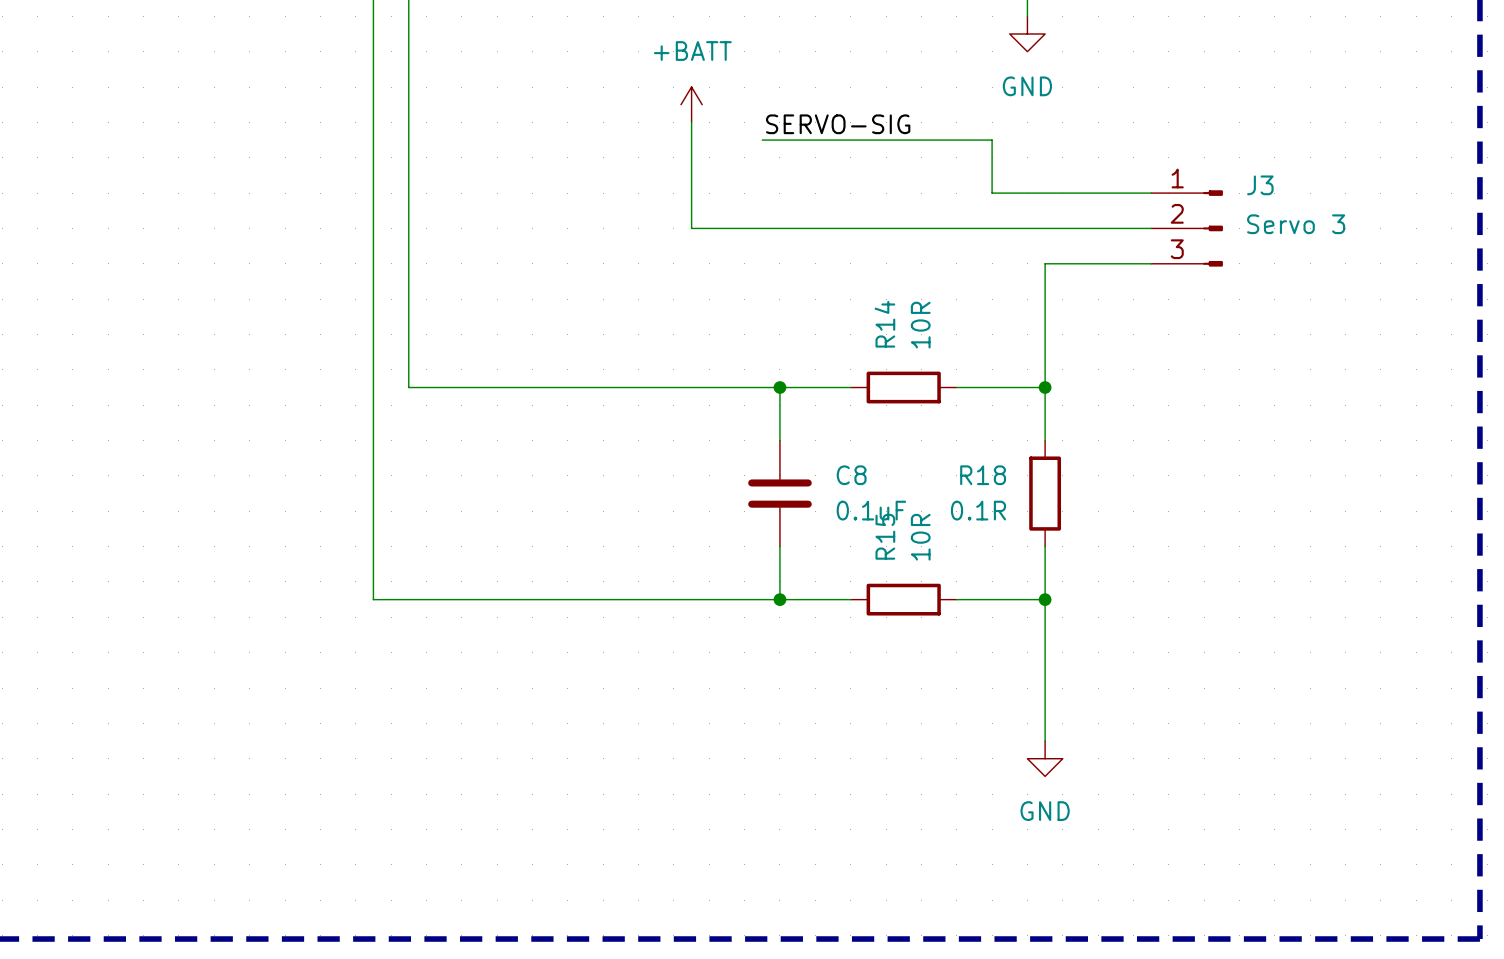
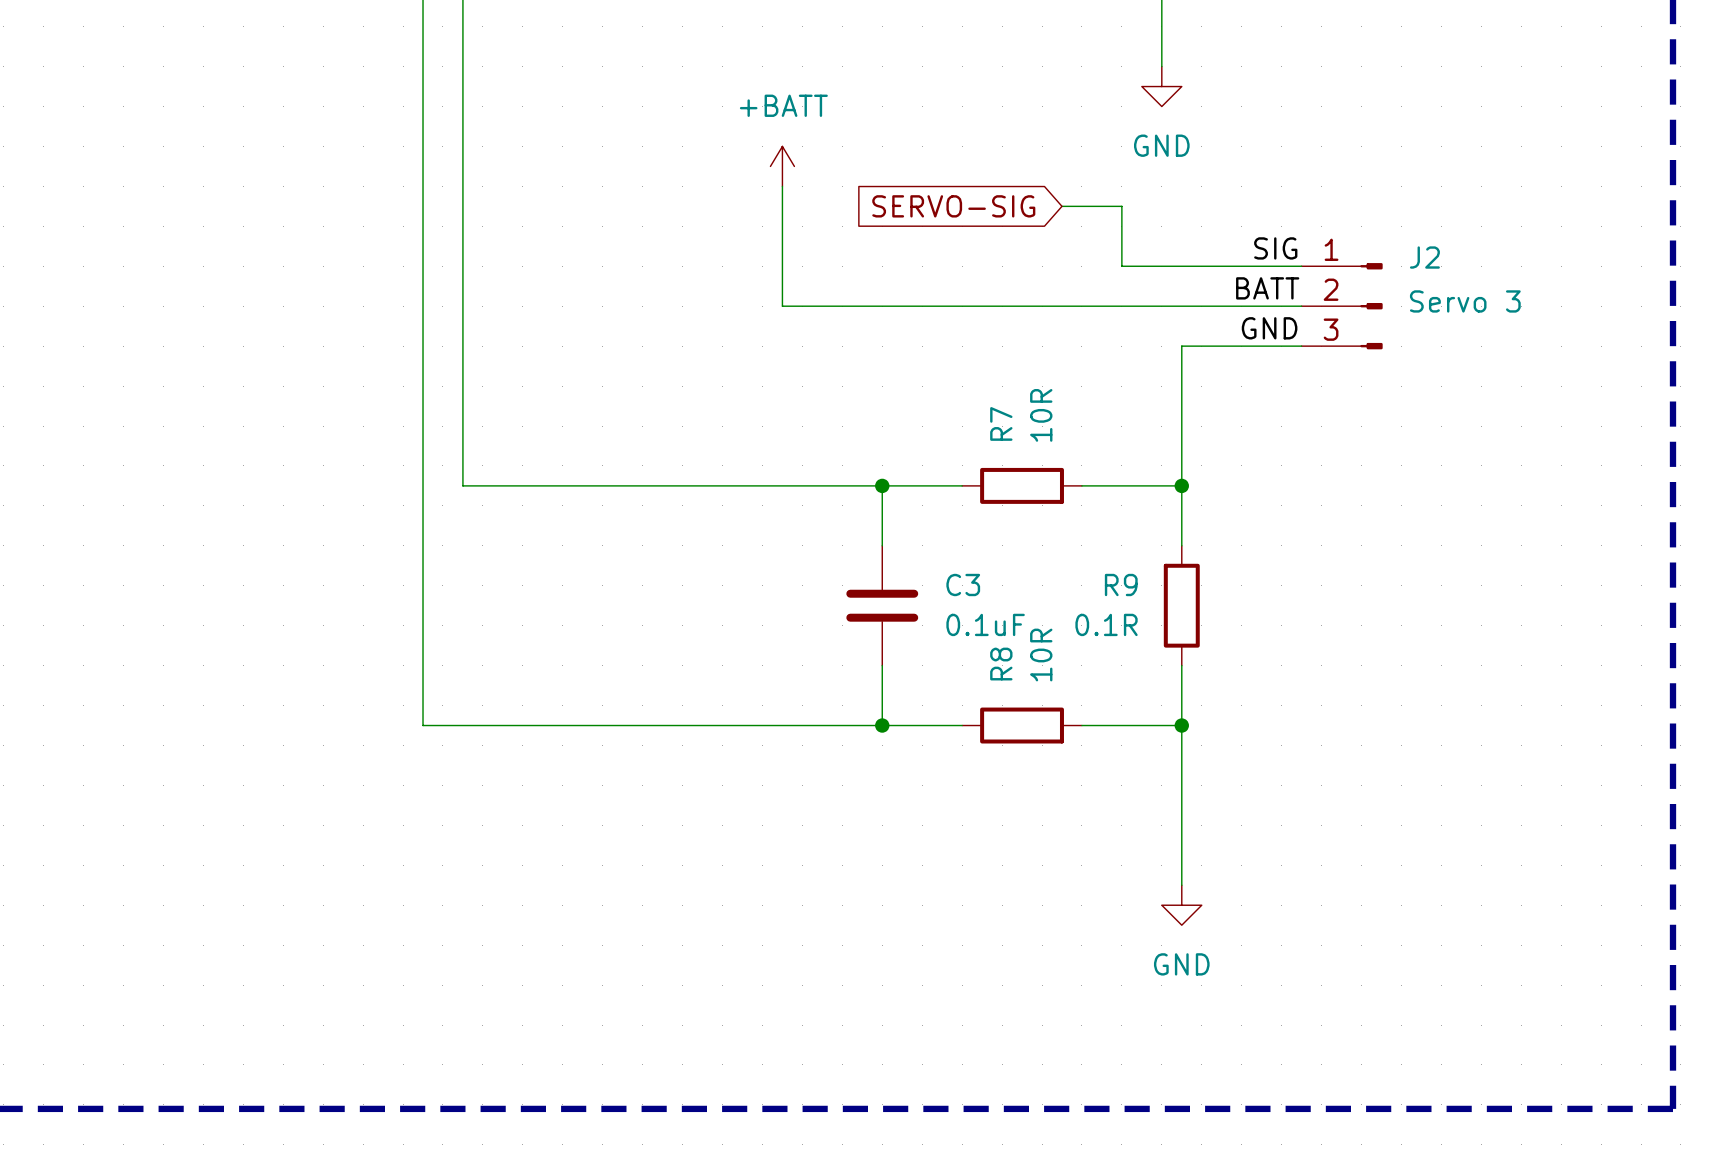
label: SERVO-SIG (838, 124) -> none
wire: (762, 140) (939, 140) -> none
global label: none -> SERVO-SIG (953, 206)
label: none -> SIG (1275, 248)
J3 name: J3 (1260, 185) -> J2 (1424, 257)
label: none -> BATT (1267, 288)
label: none -> GND (1269, 328)
R14 name: R14 (884, 324) -> R7 (1001, 423)
C8 name: C8 (851, 475) -> C3 (963, 585)
R18 name: R18 (983, 475) -> R9 (1121, 585)
R15 name: R15 (885, 536) -> R8 (1001, 664)

